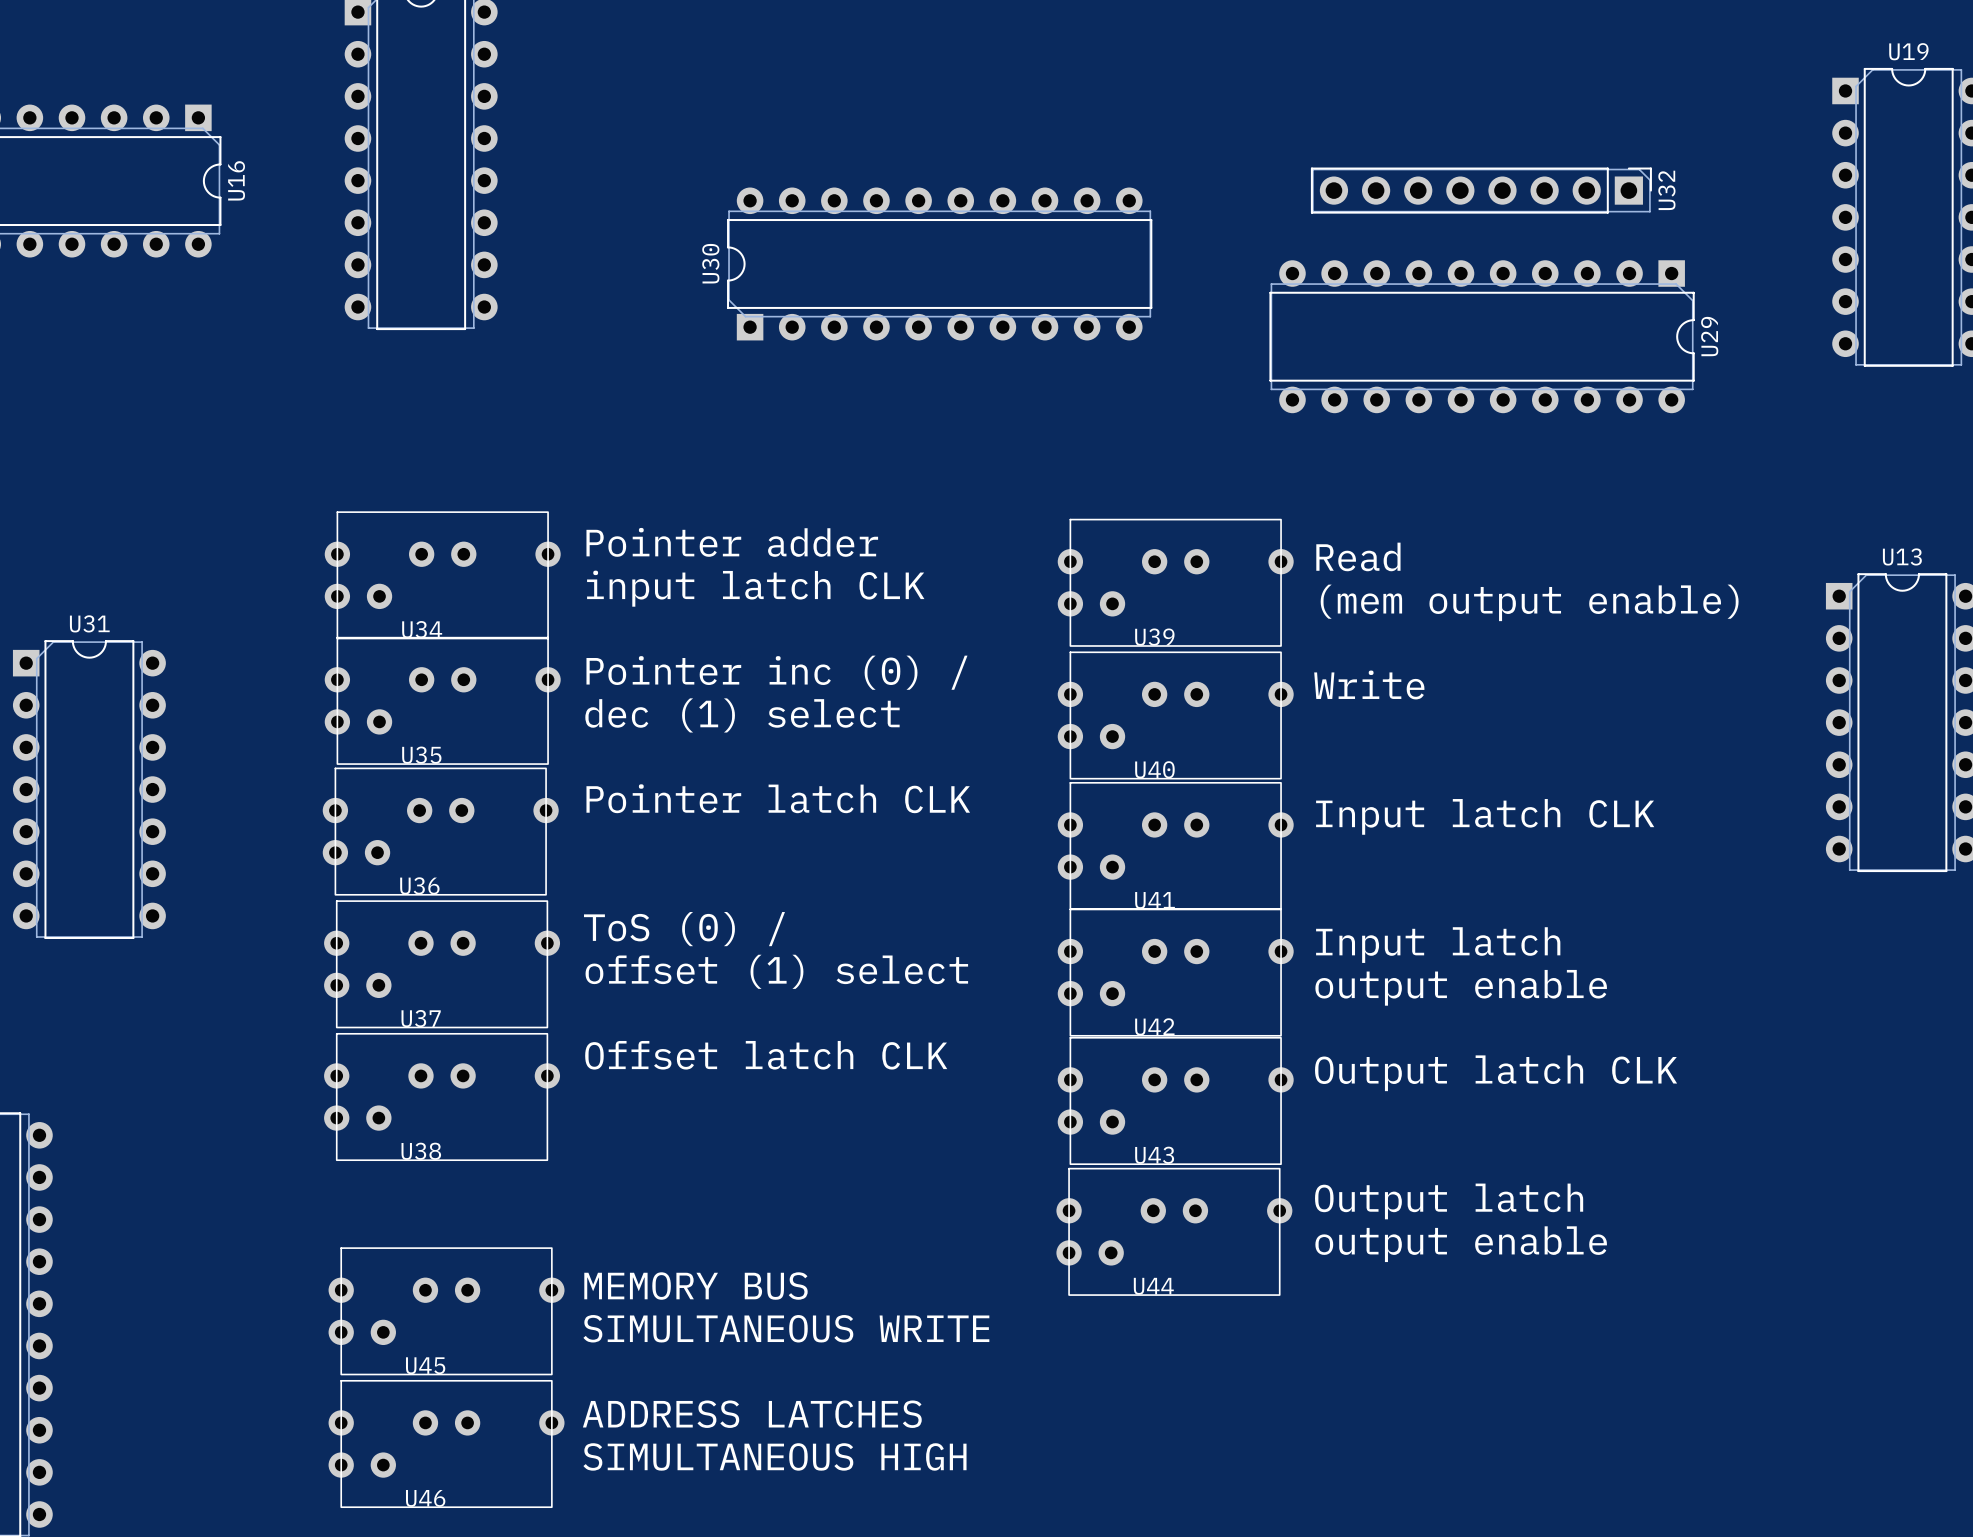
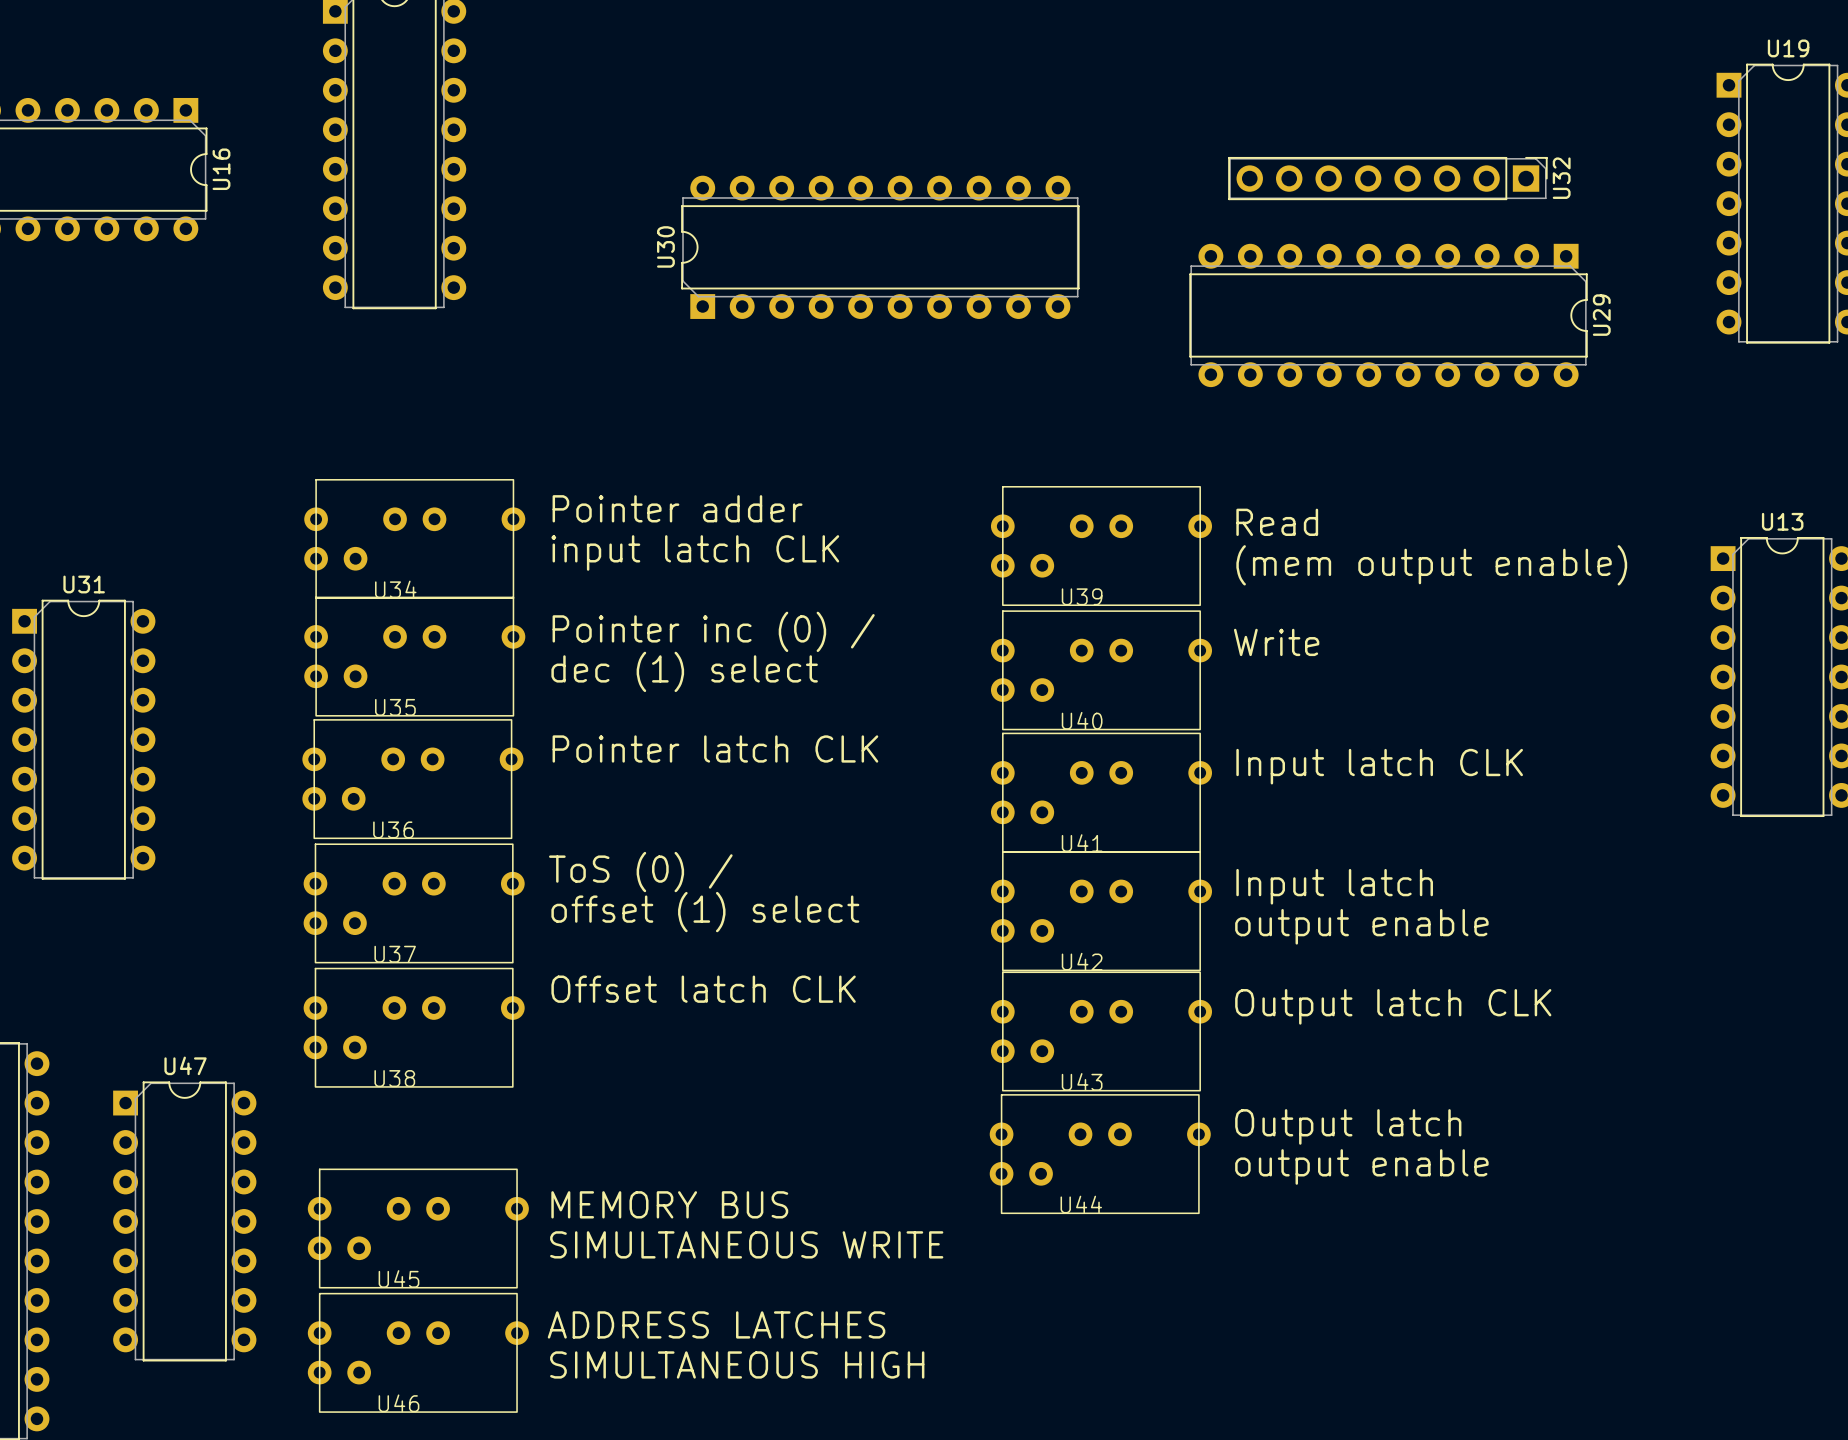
U47: none -> (184, 1221)

